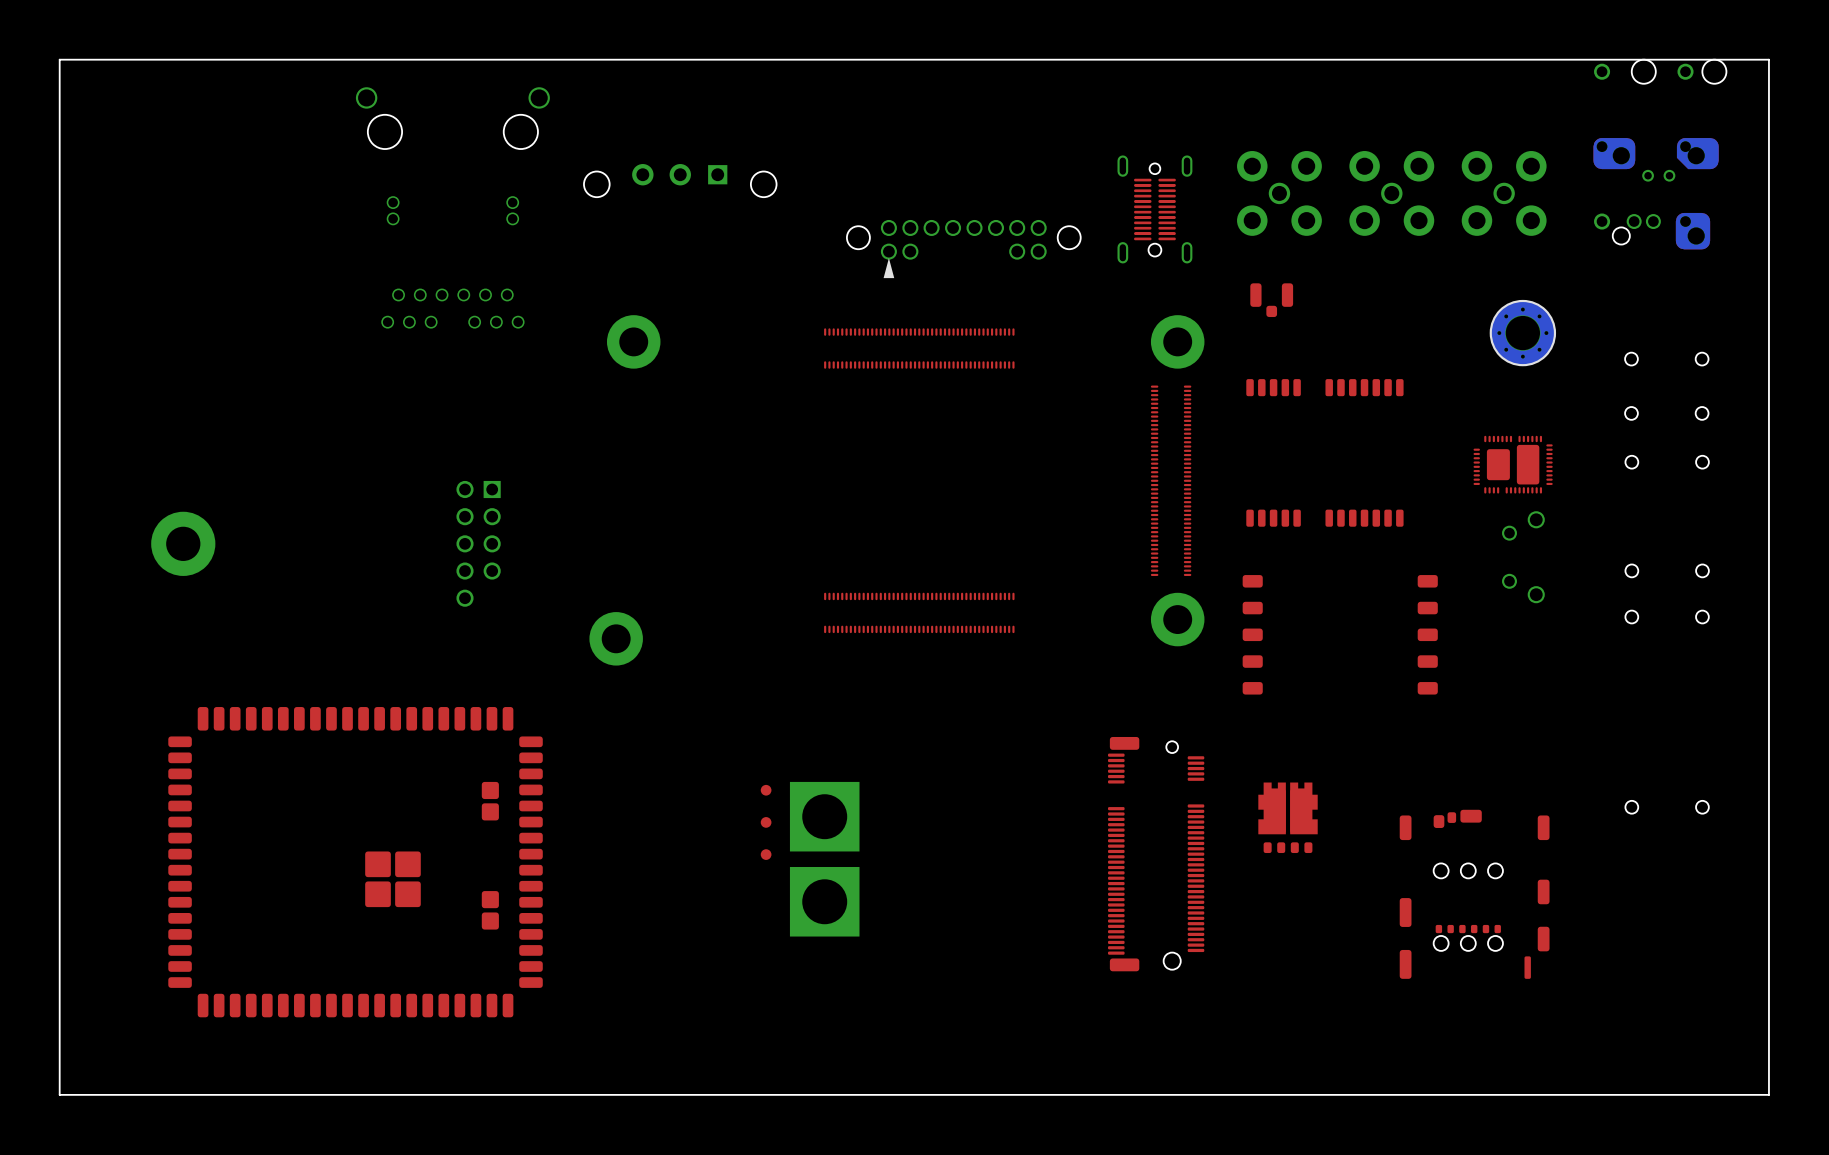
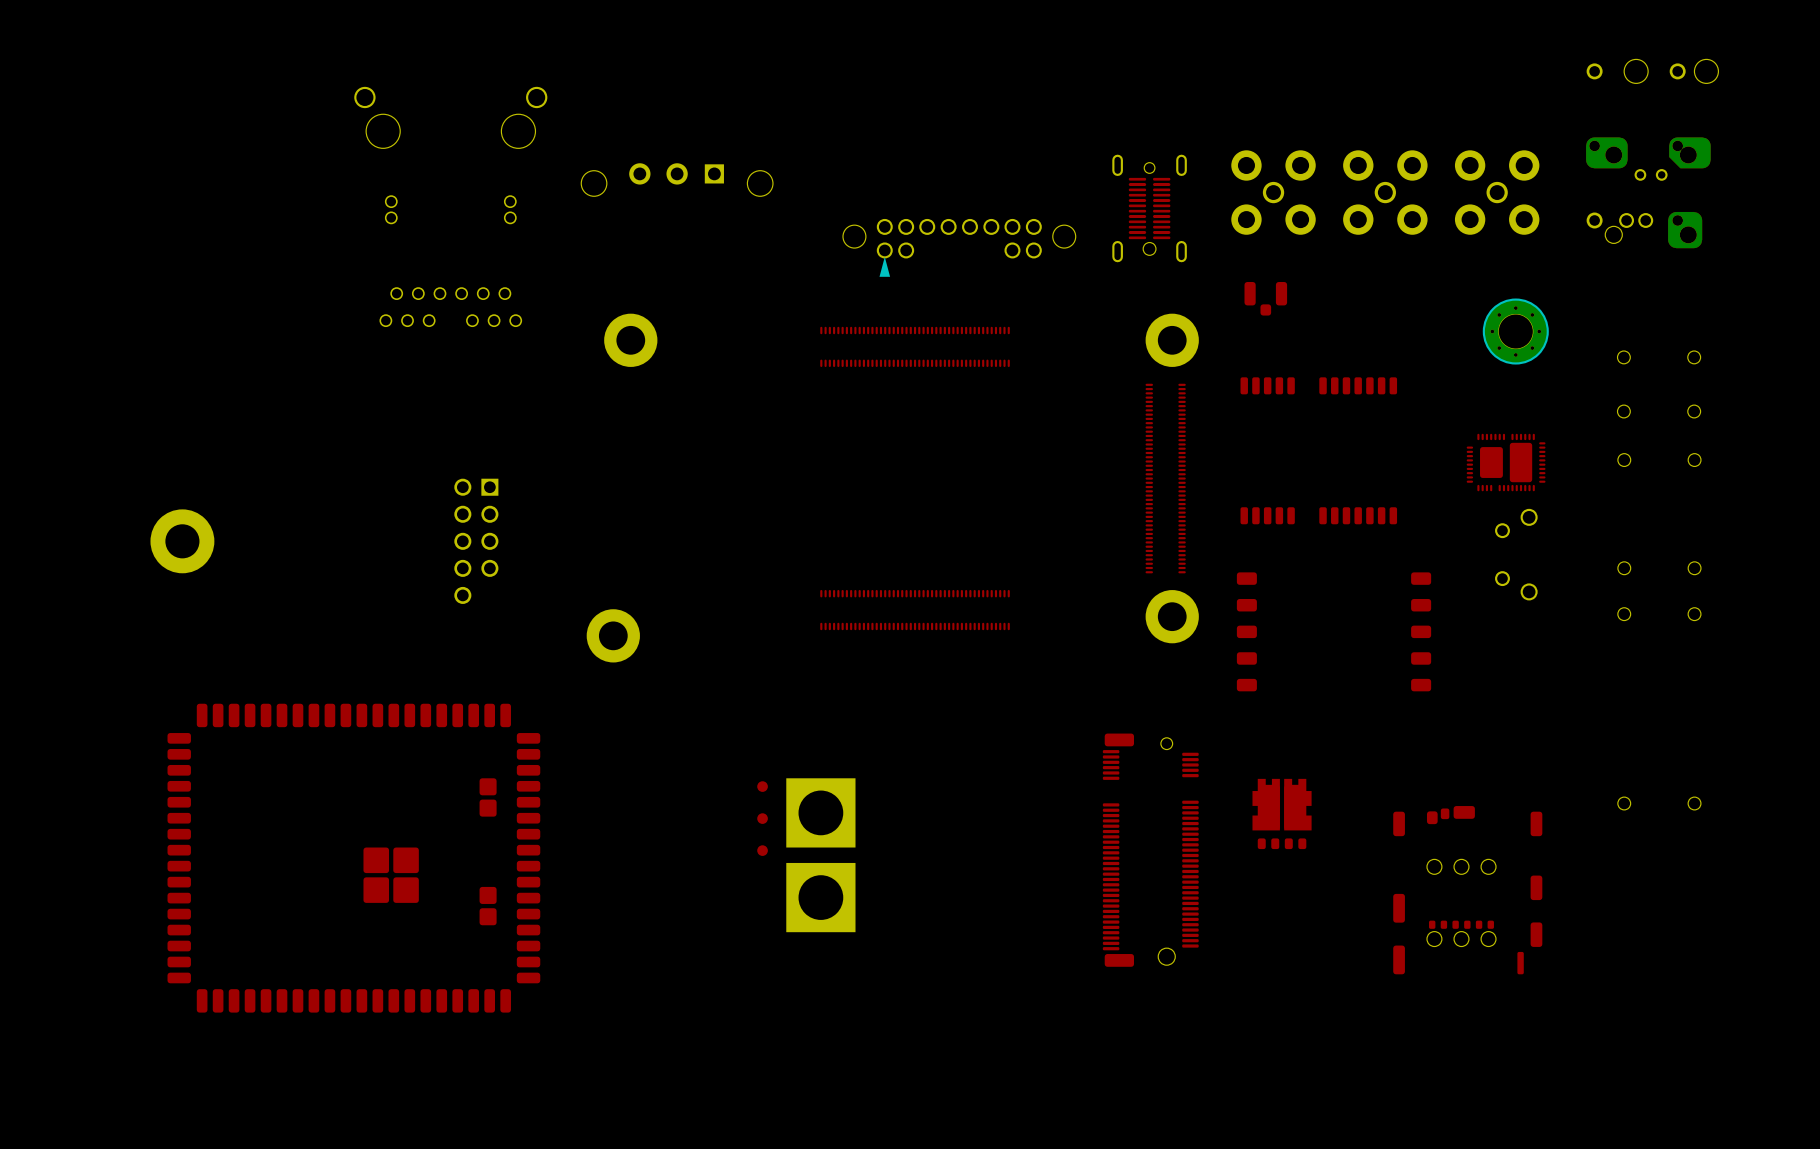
board edge: (1768, 59) (59, 59) (59, 1094) (1768, 1094) (1768, 59) -> none

